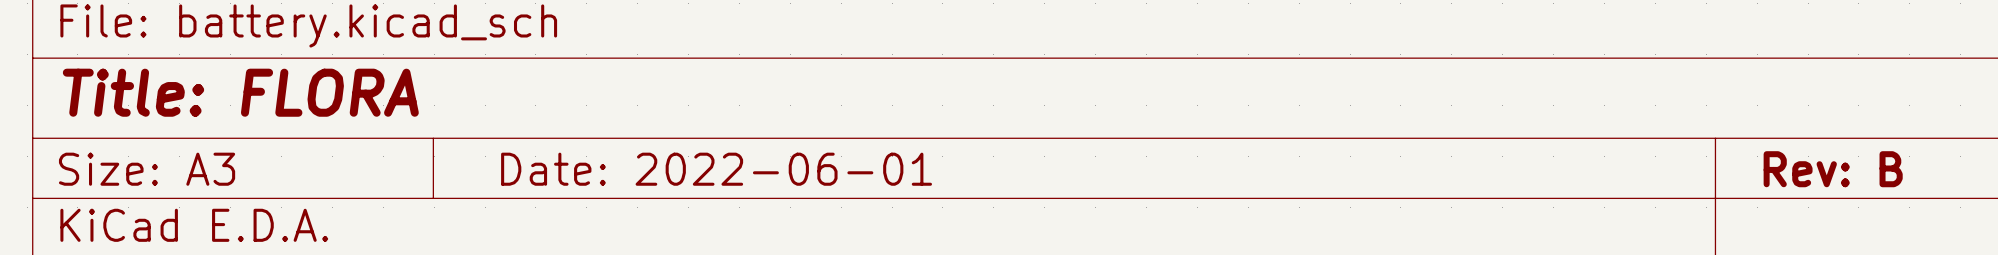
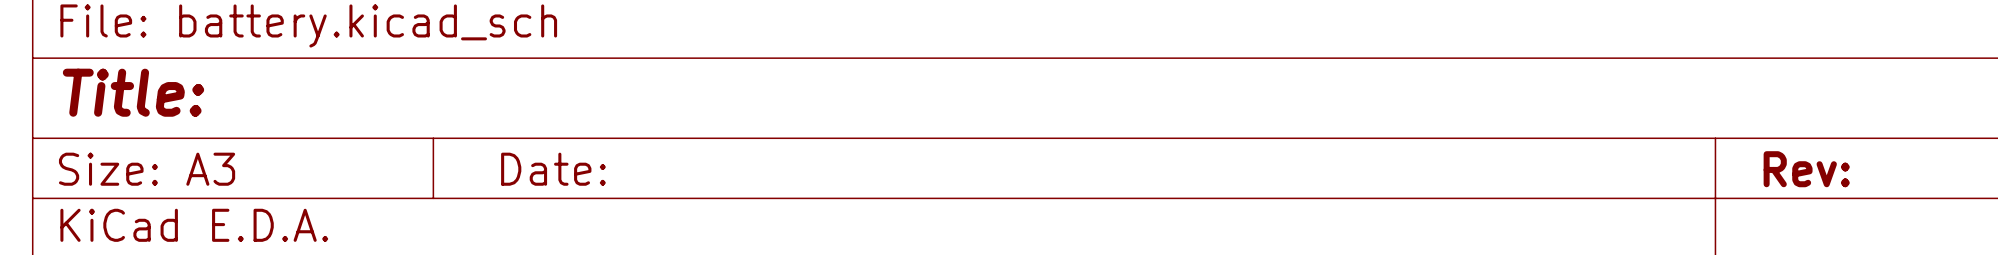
title block: Title: FLORA (240, 92) -> Title: (133, 92)
title block: Date: 2022-06-01 (716, 169) -> Date: (553, 169)
title block: Rev: B (1833, 169) -> Rev: (1806, 169)

